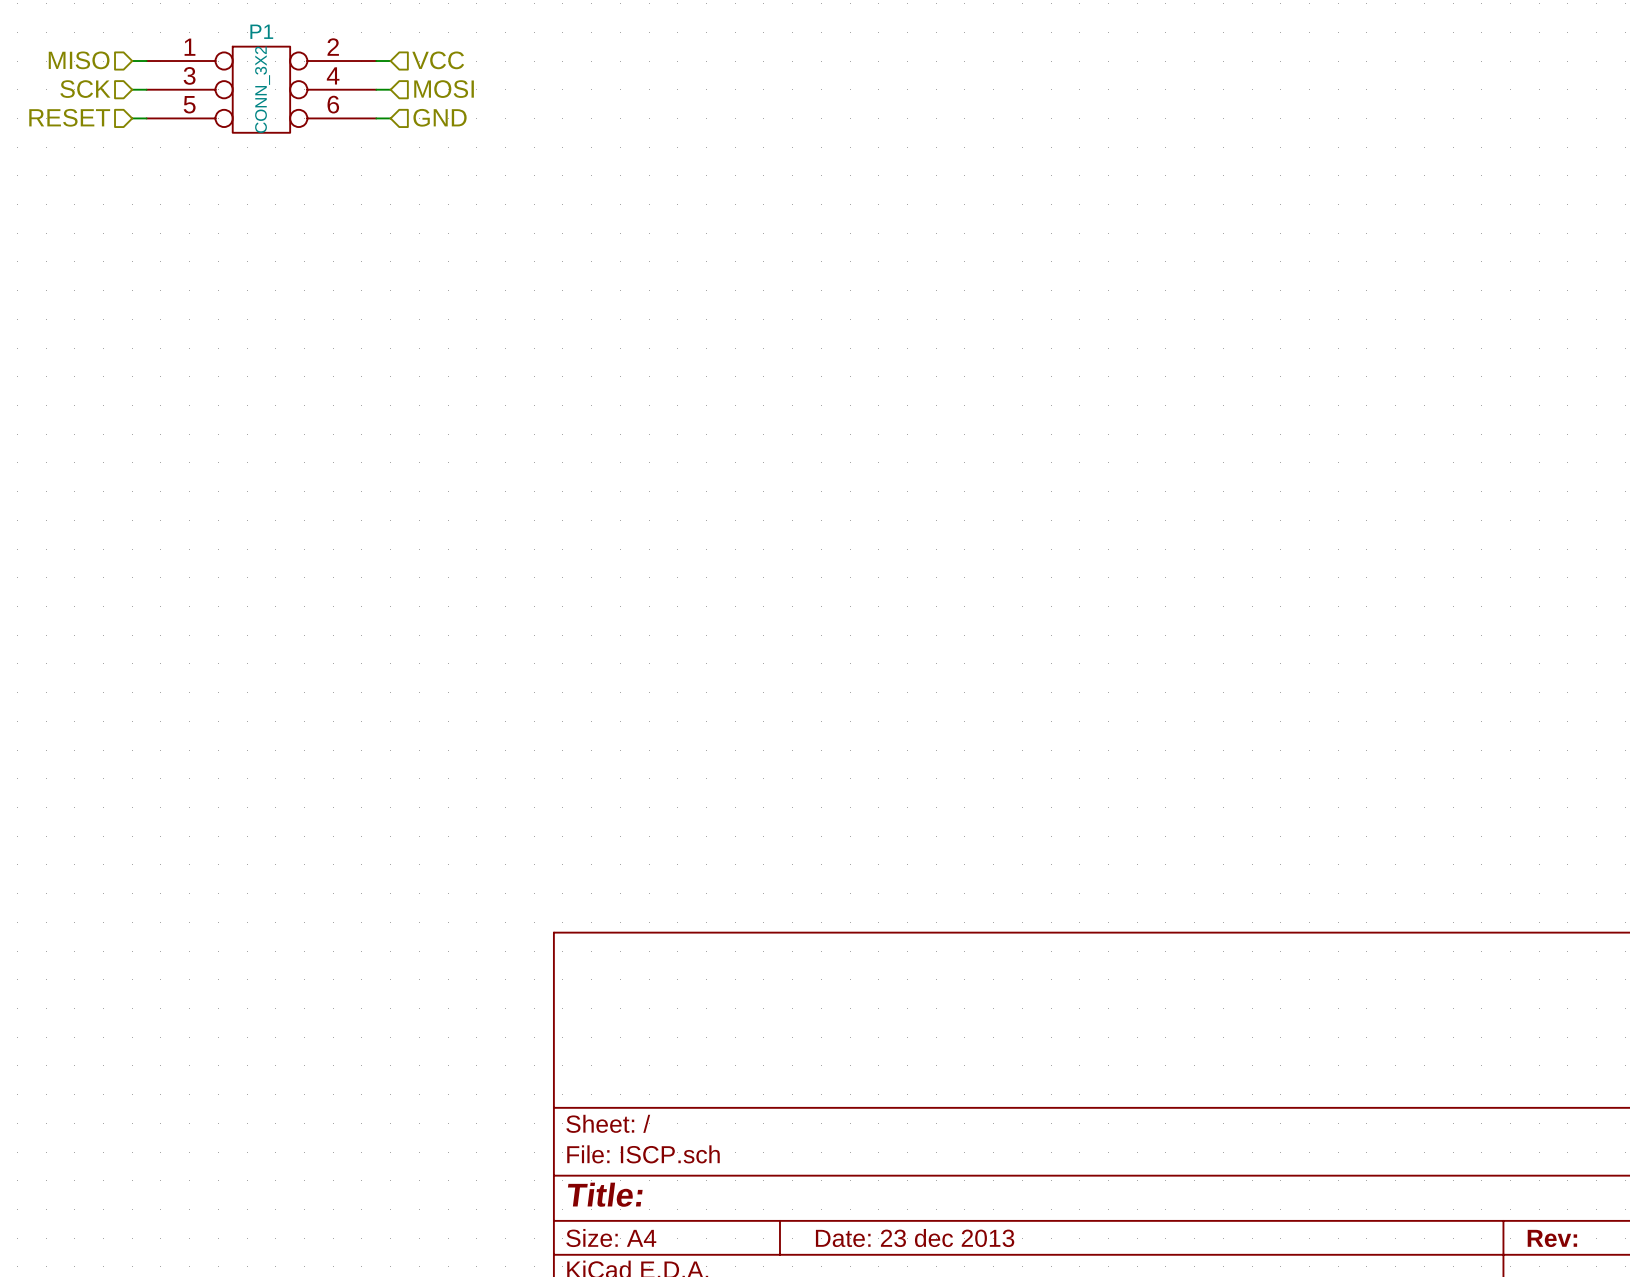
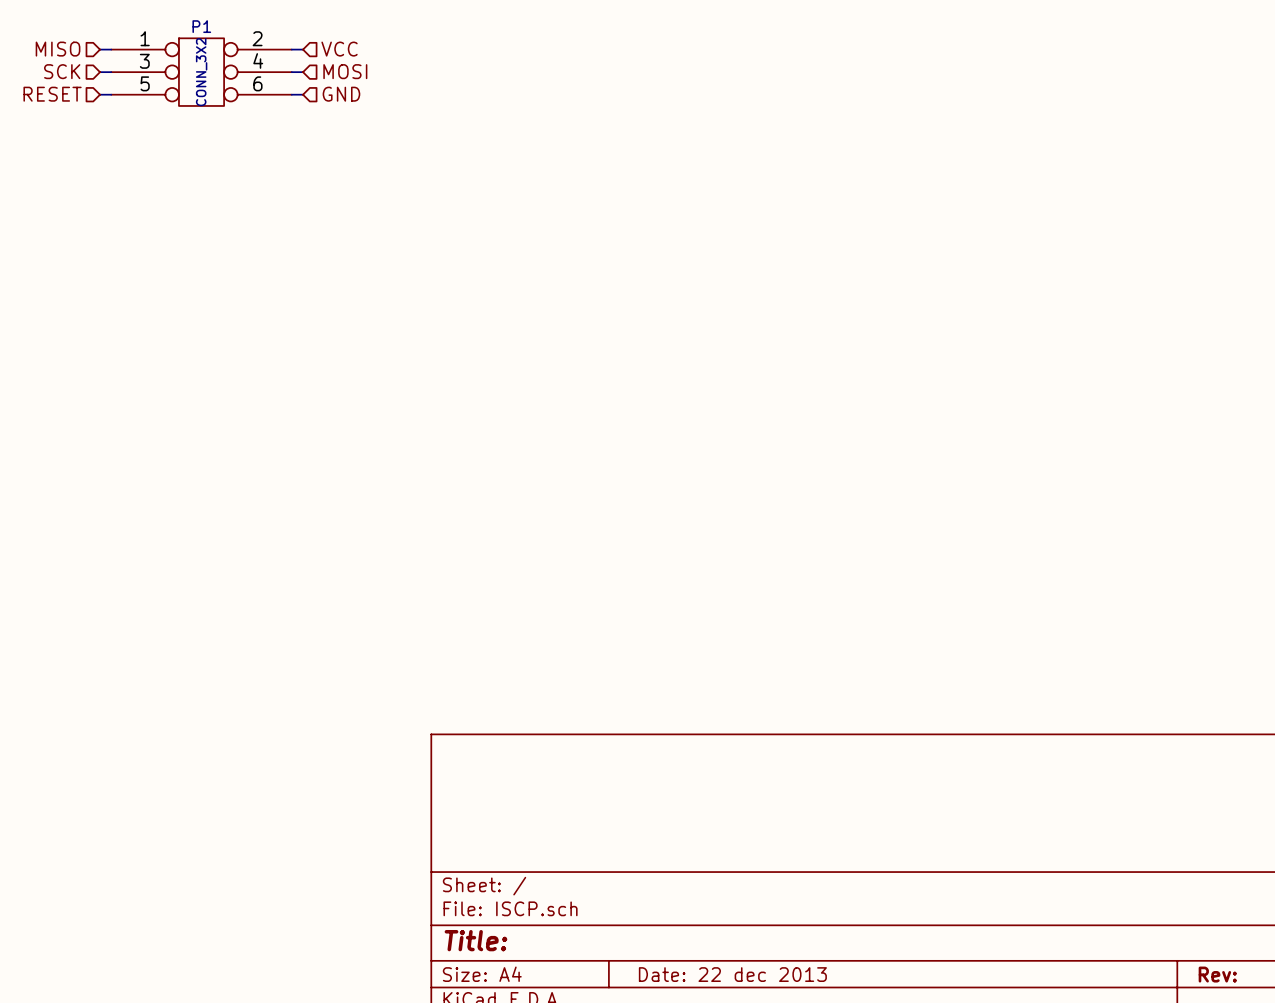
title block: Date: 23 dec 2013 (915, 1238) -> Date: 22 dec 2013 (732, 974)

